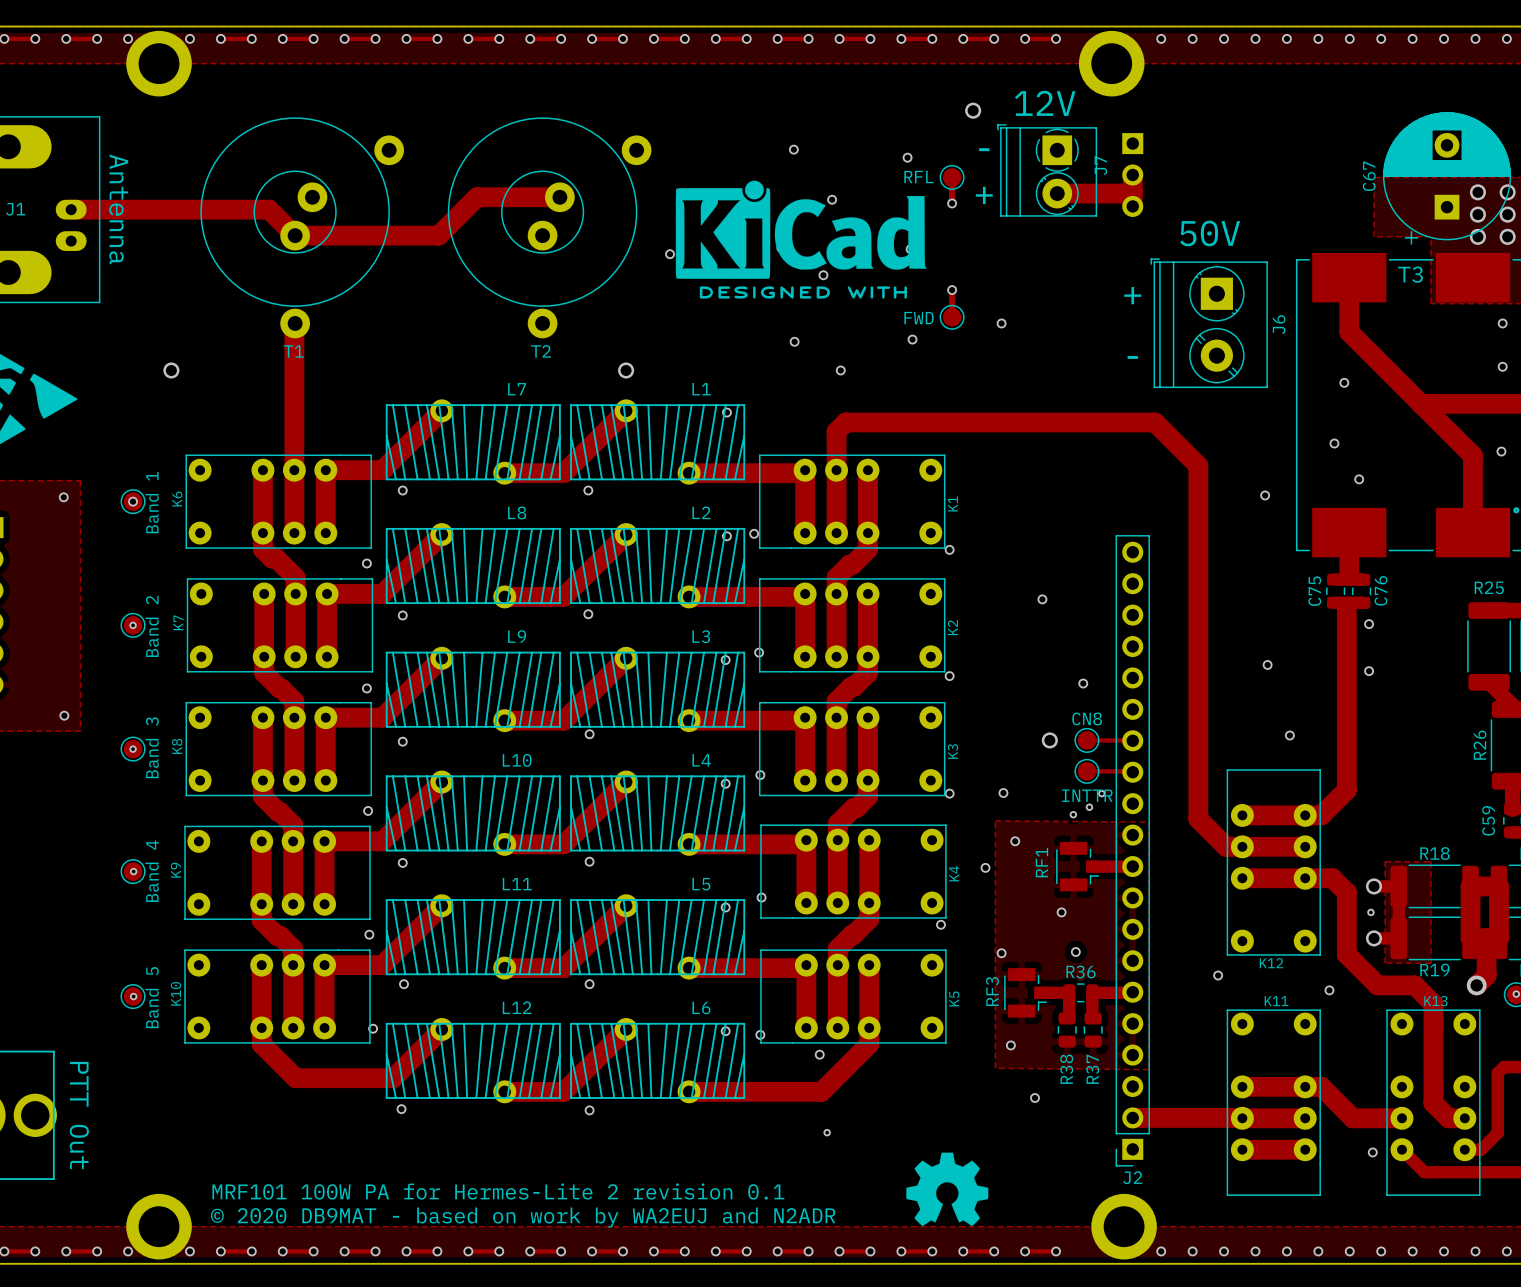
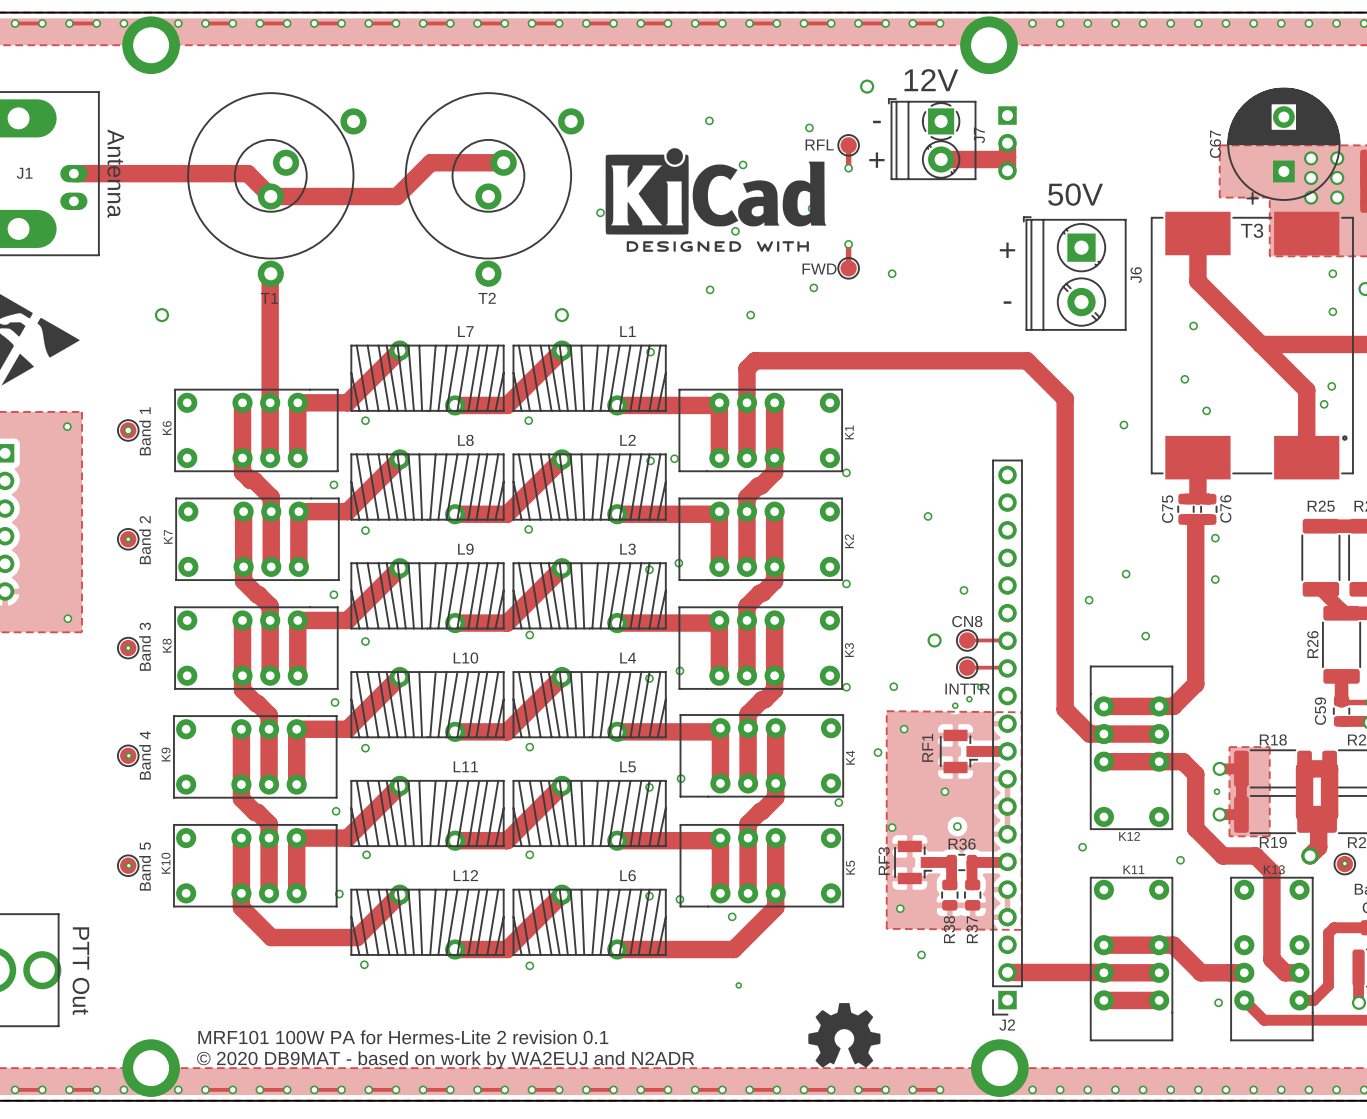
via: none -> (1324, 404)
via: none -> (1089, 600)

